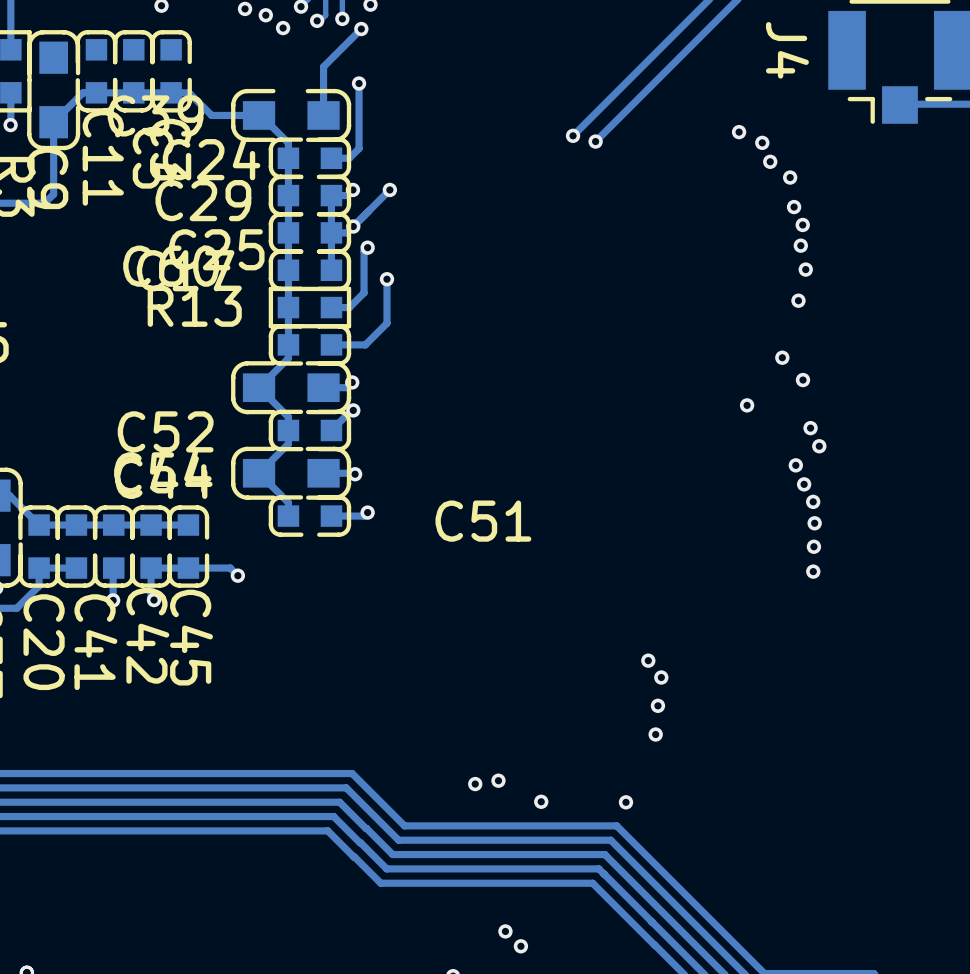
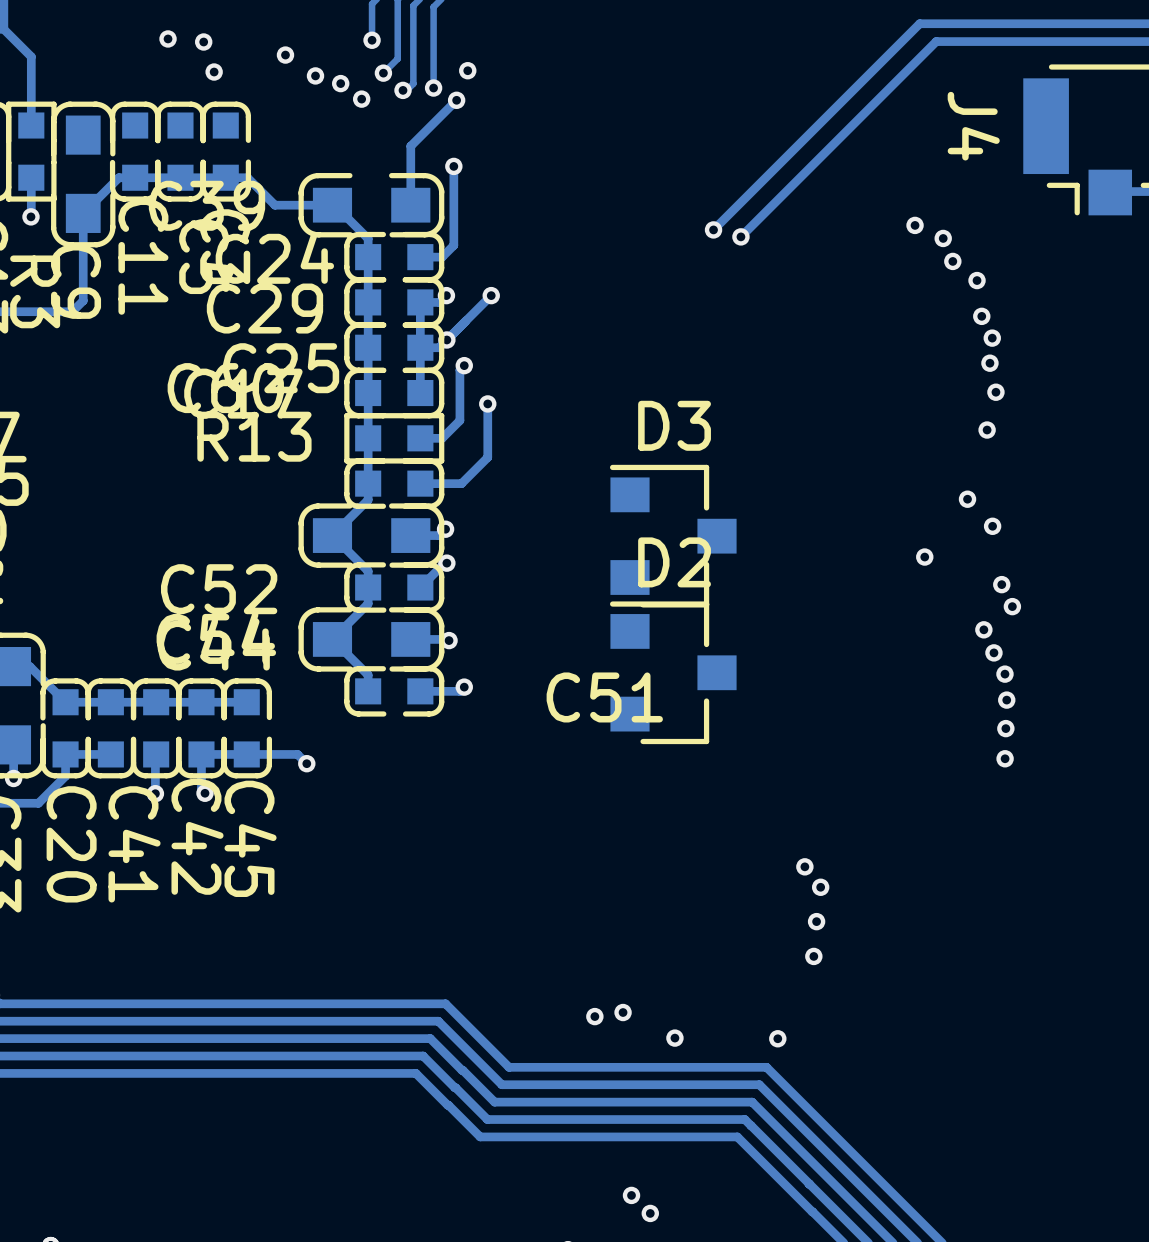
D3: none -> (673, 536)
D2: none -> (673, 672)

